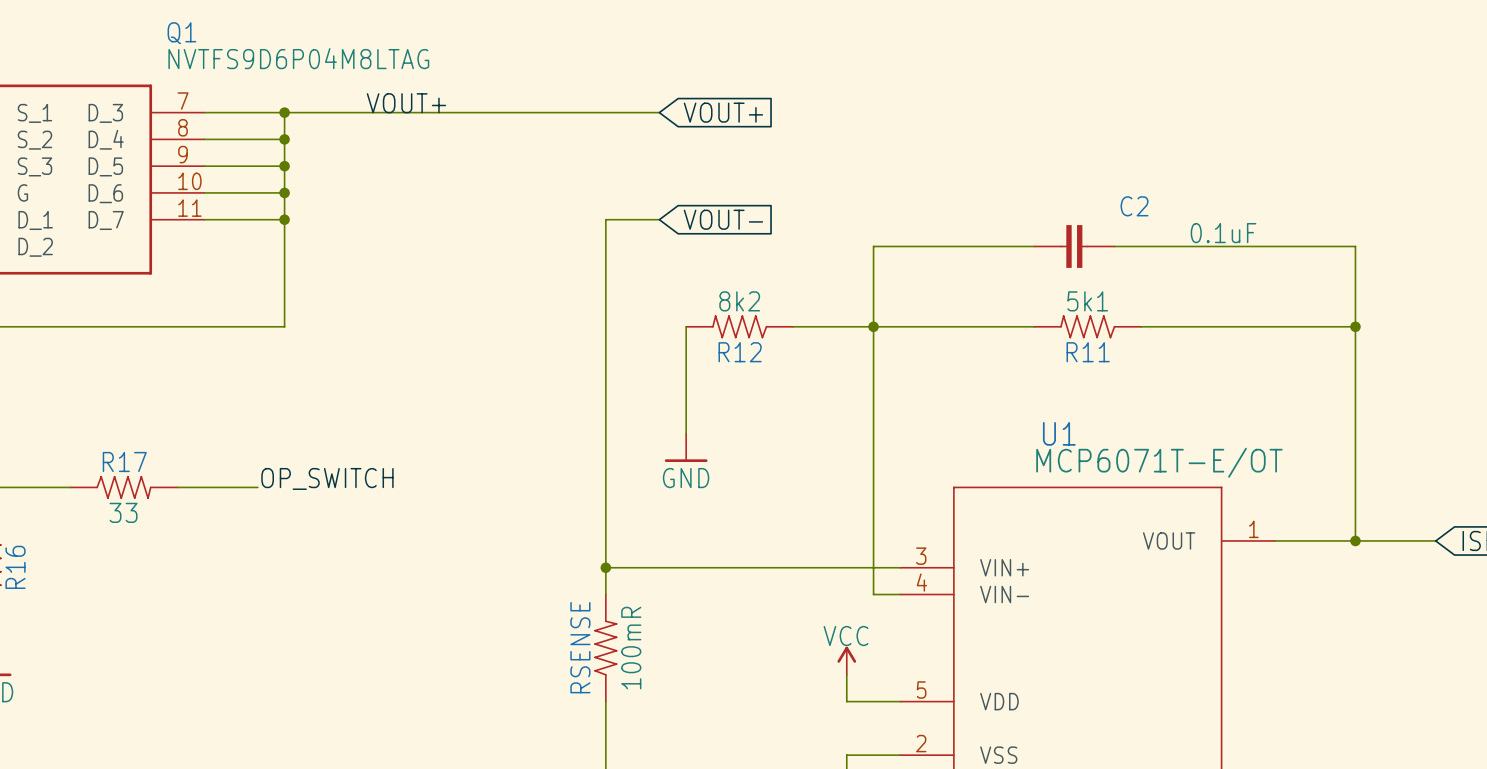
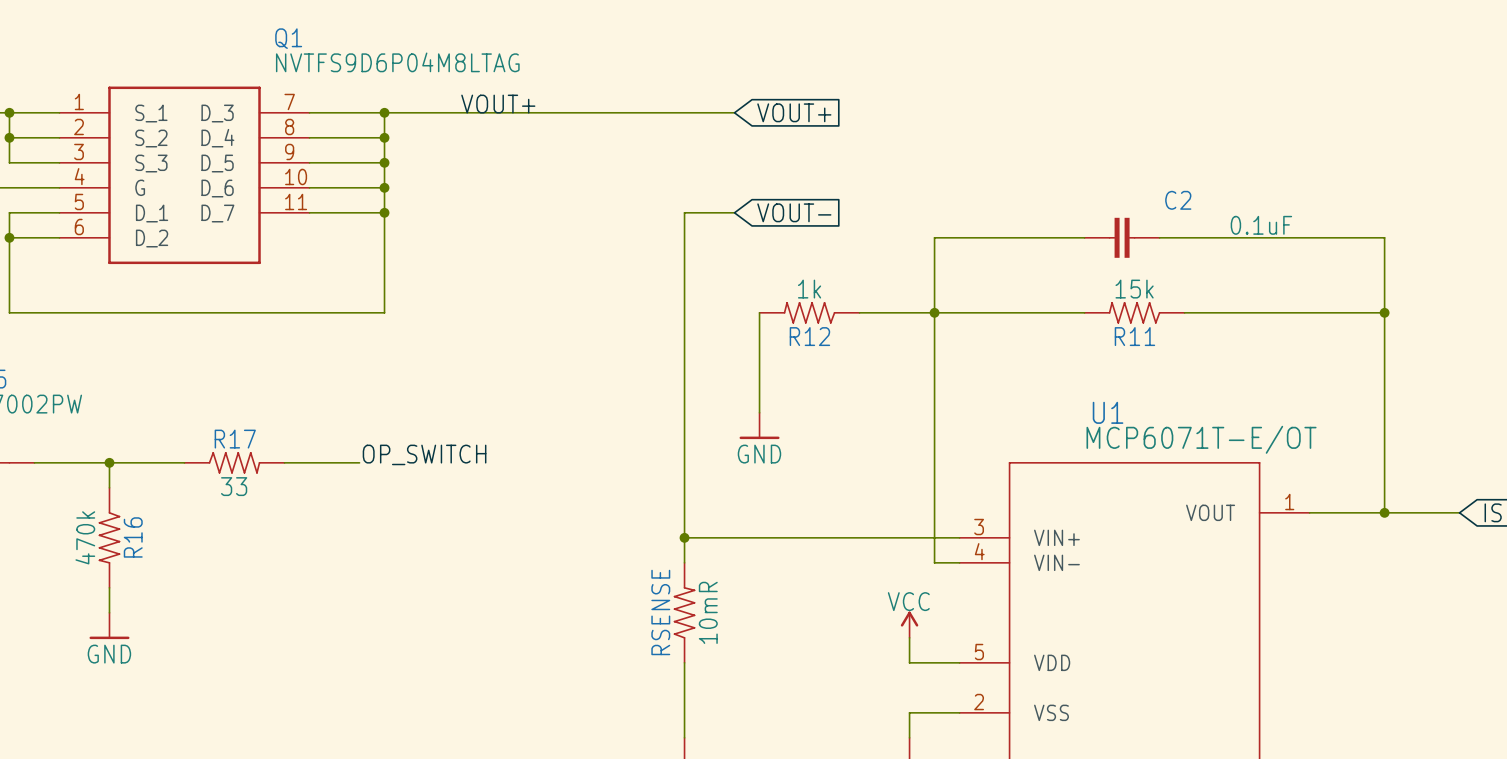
R12 value: 8k2 (739, 301) -> 1k (809, 289)
R11 value: 5k1 (1087, 301) -> 15k (1134, 289)
RSENSE value: 100mR (631, 648) -> 10mR (708, 612)

